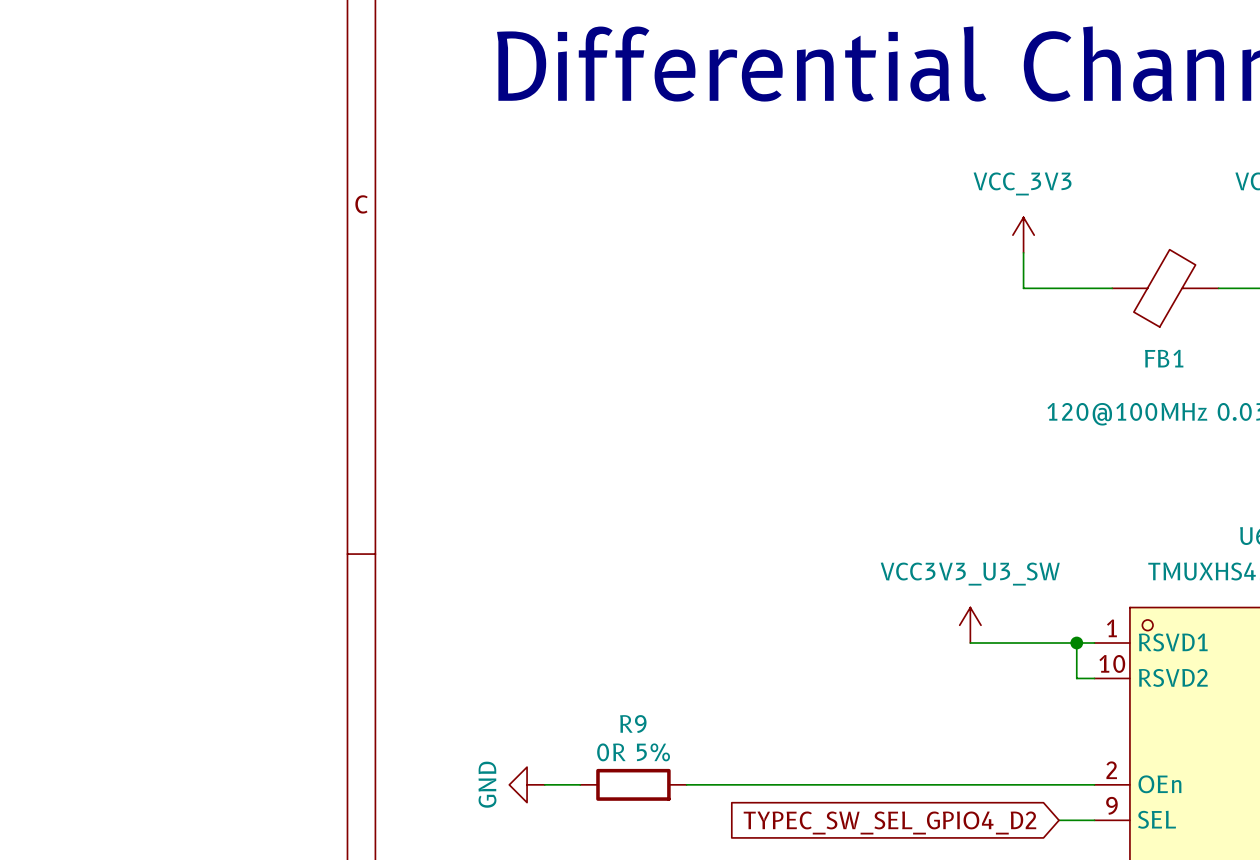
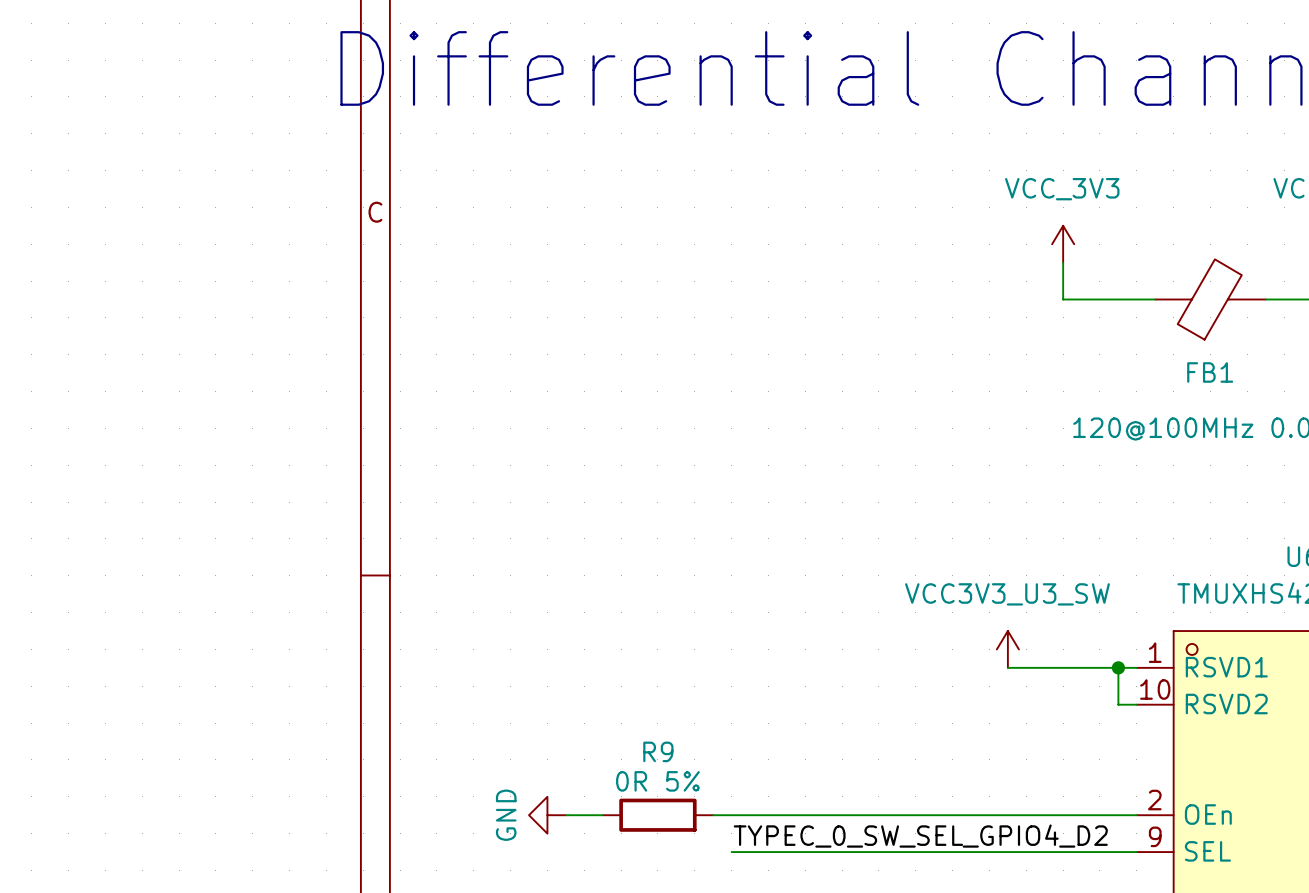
label: none -> TYPEC_0_SW_SEL_GPIO4_D2 (920, 836)
wire: none -> (731, 852) (1099, 852)
global label: TYPEC_SW_SEL_GPIO4_D2 (889, 822) -> none

